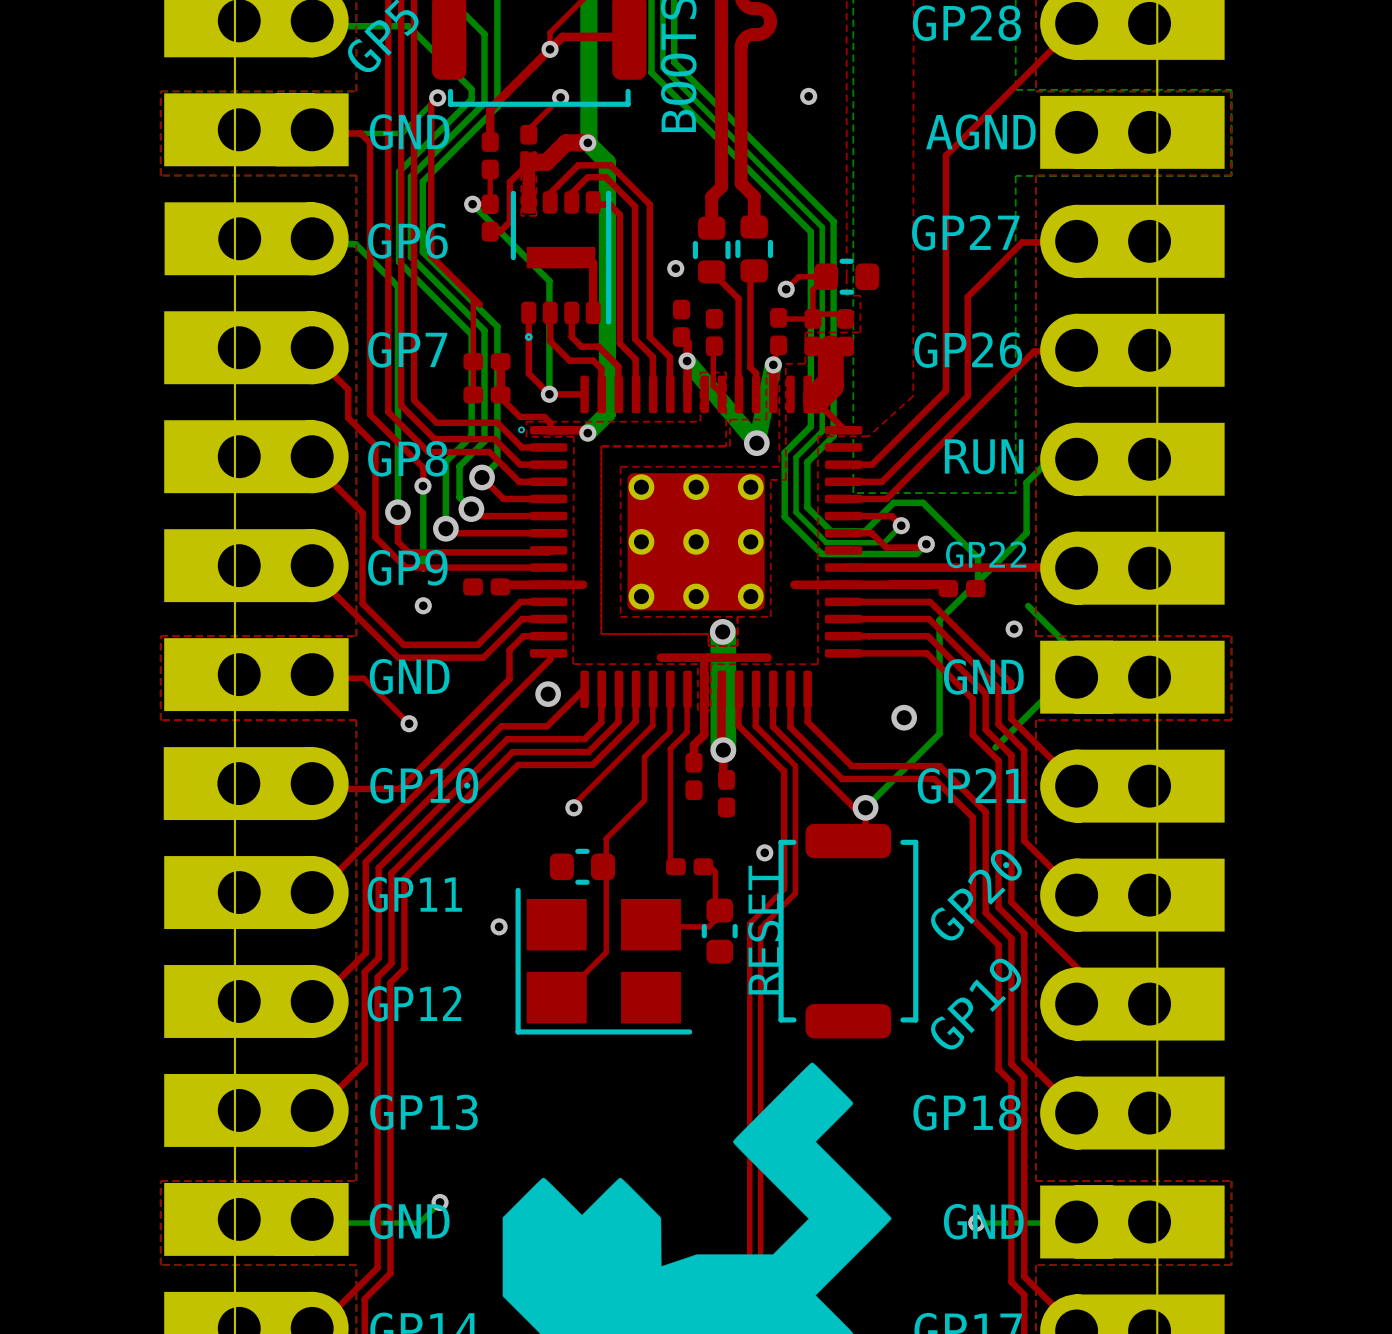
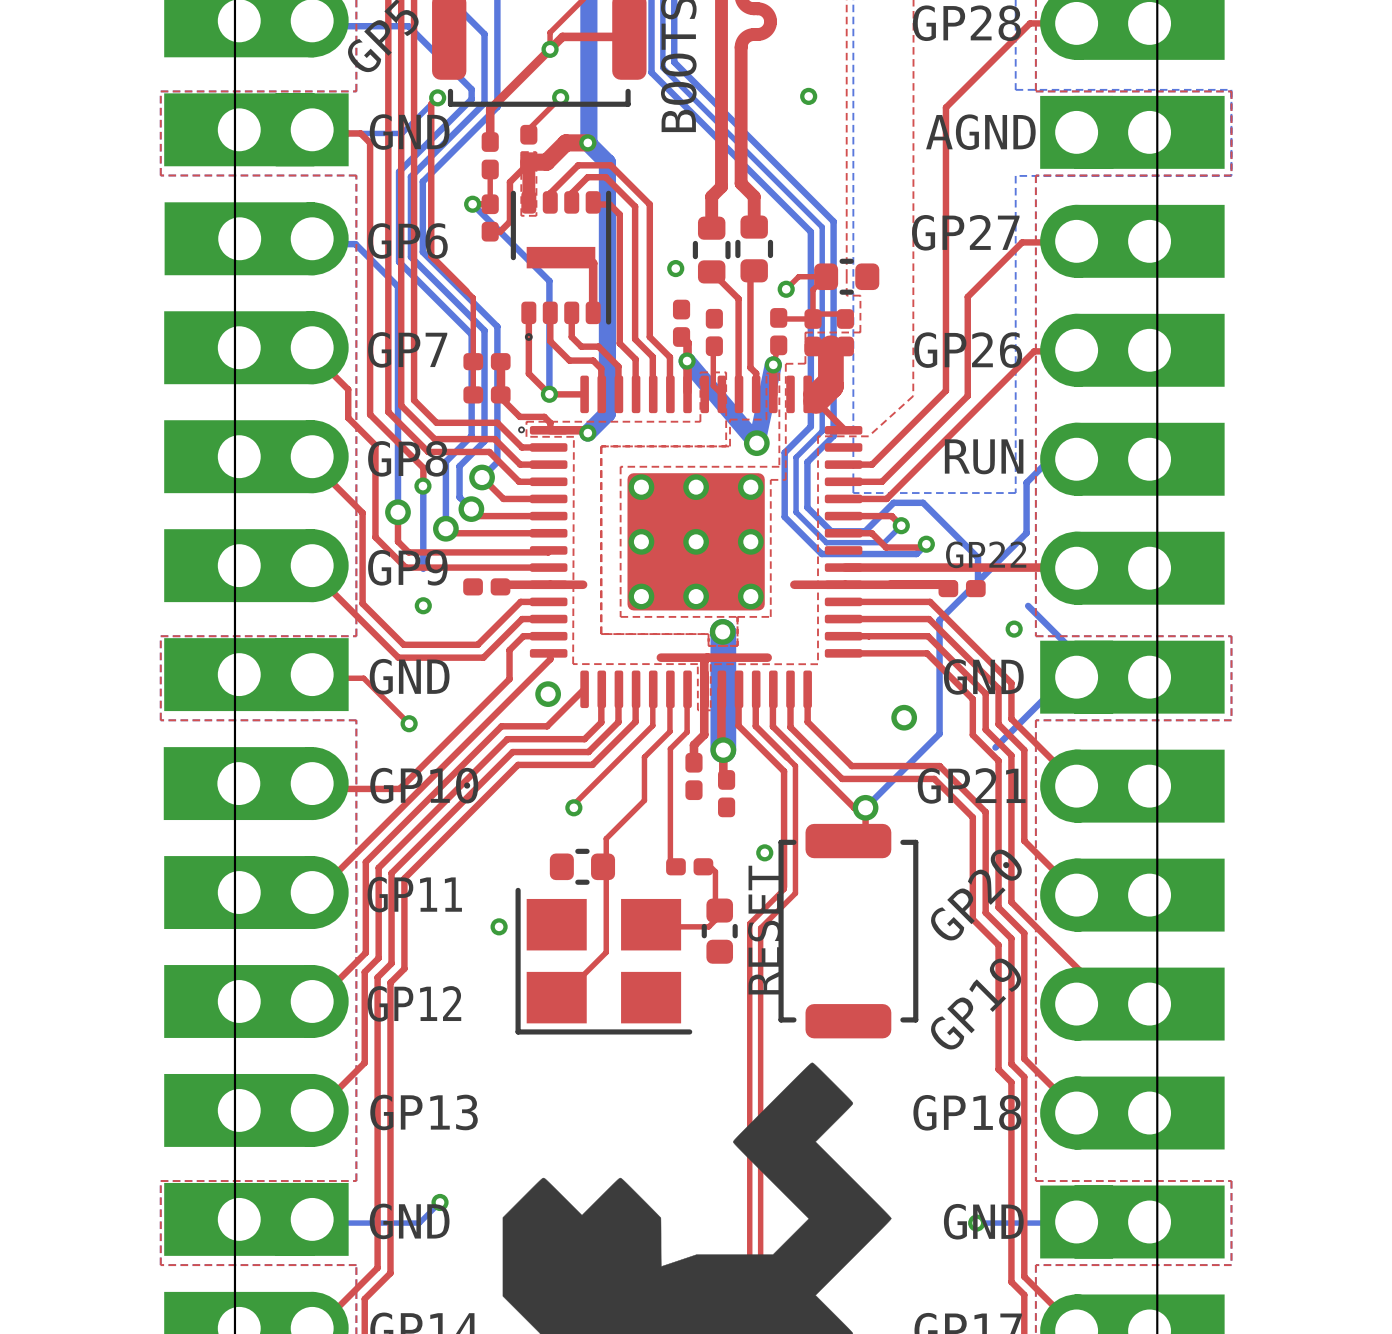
top track: (1077, 24) (945, 155) -> (1076, 23) (1030, 23) (945, 107) (945, 155)
top track: (466, 291) (479, 304) -> none

